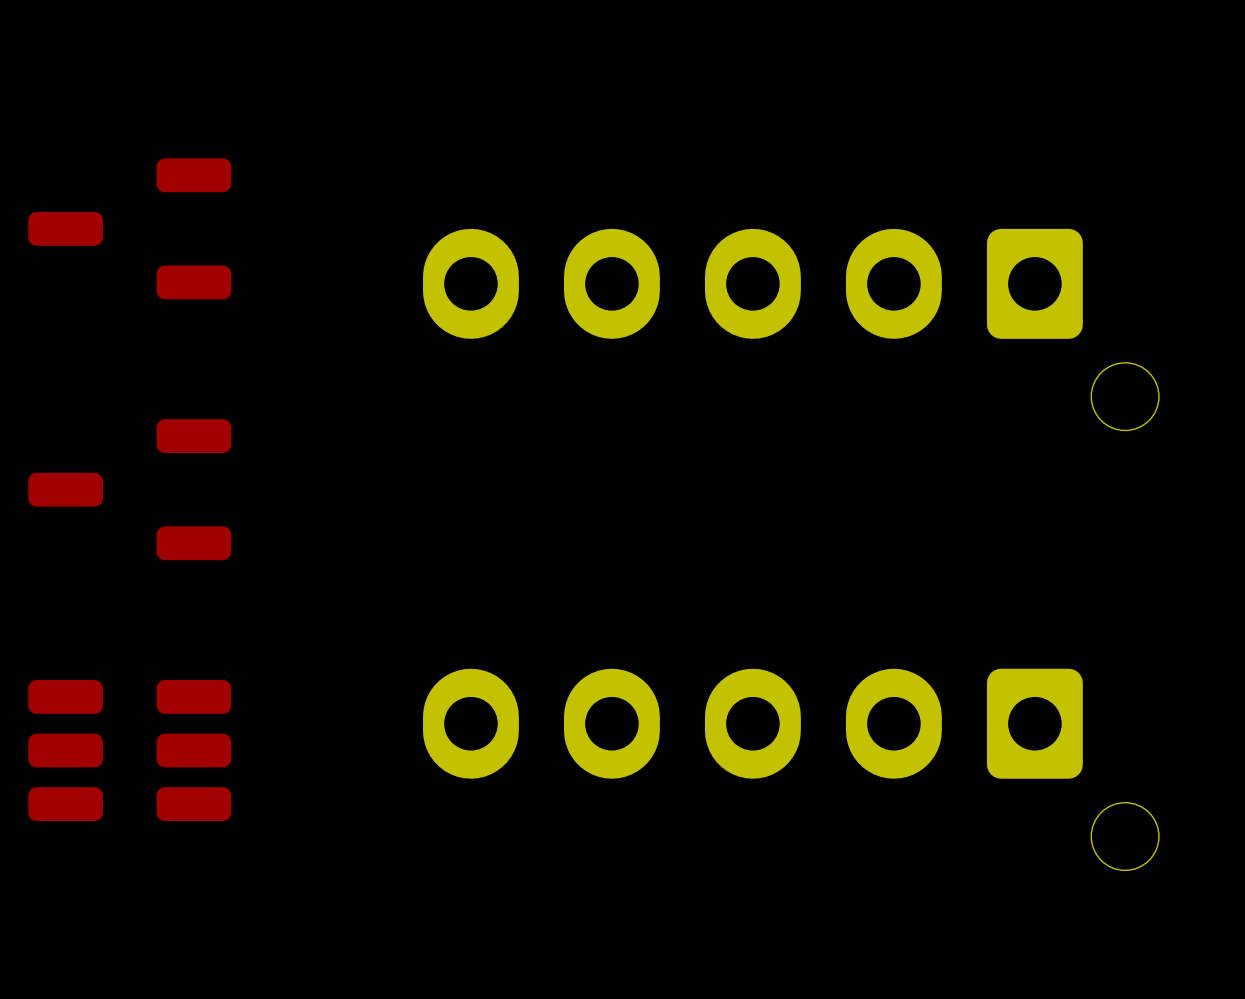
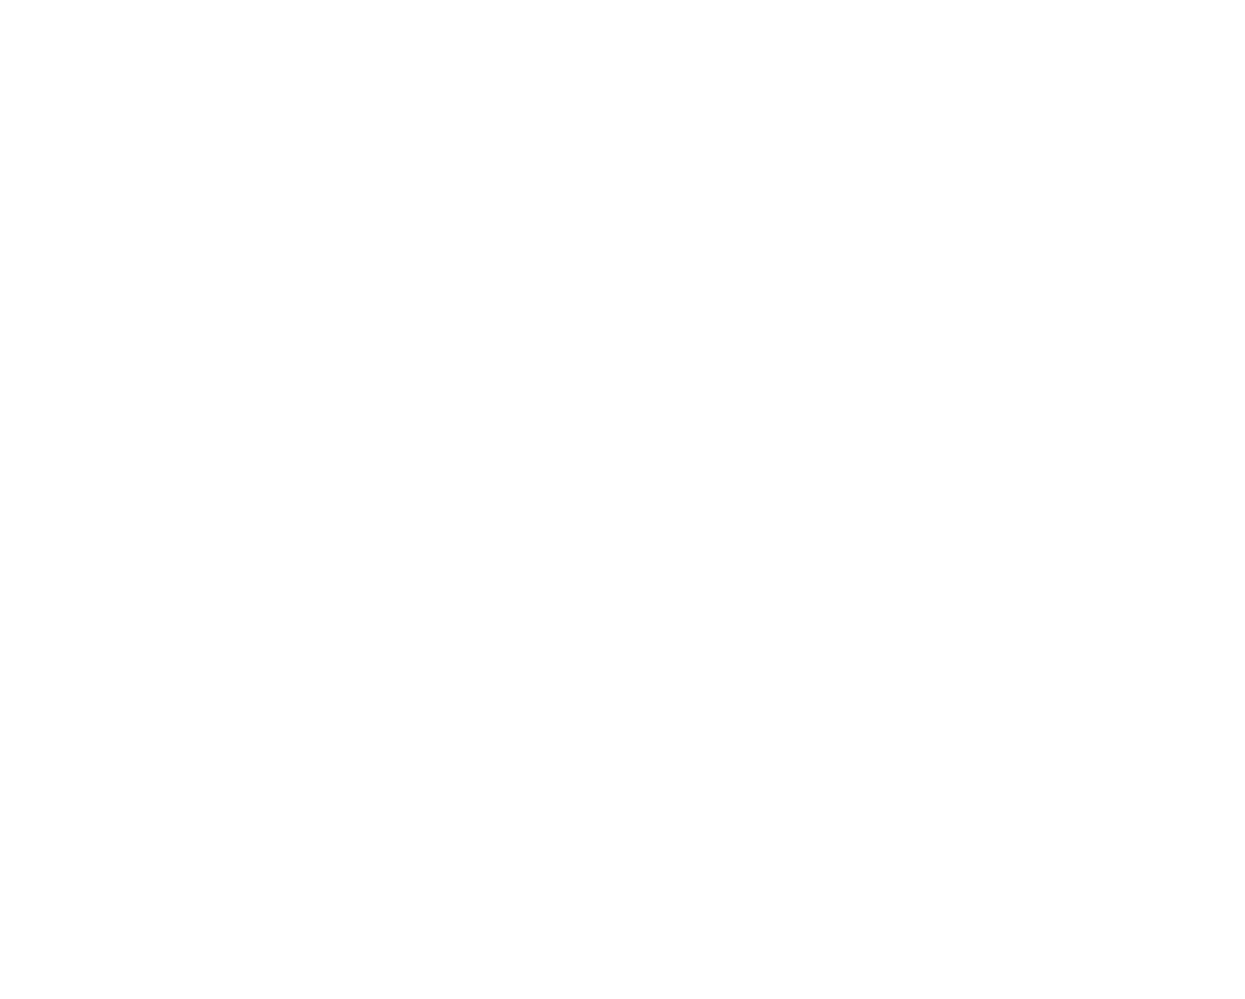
part: (129, 228) -> none
part: (790, 329) -> none
part: (129, 489) -> none
part: (129, 750) -> none
part: (790, 769) -> none

